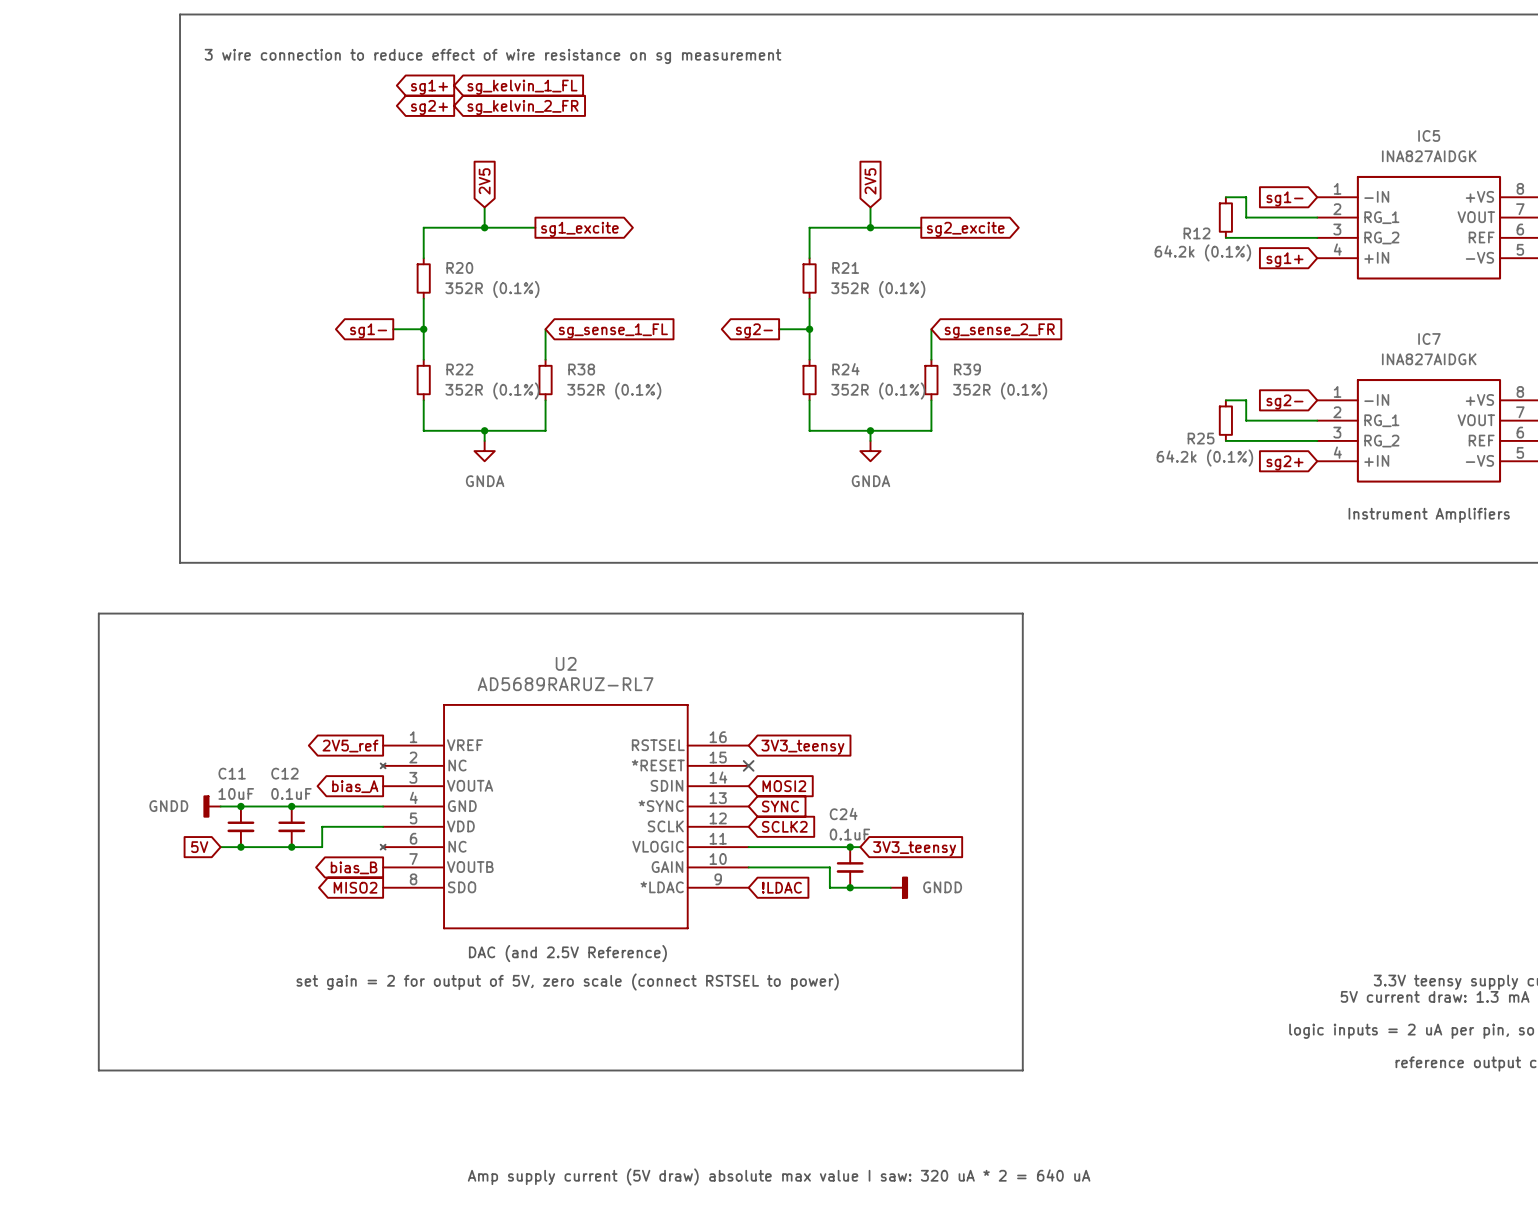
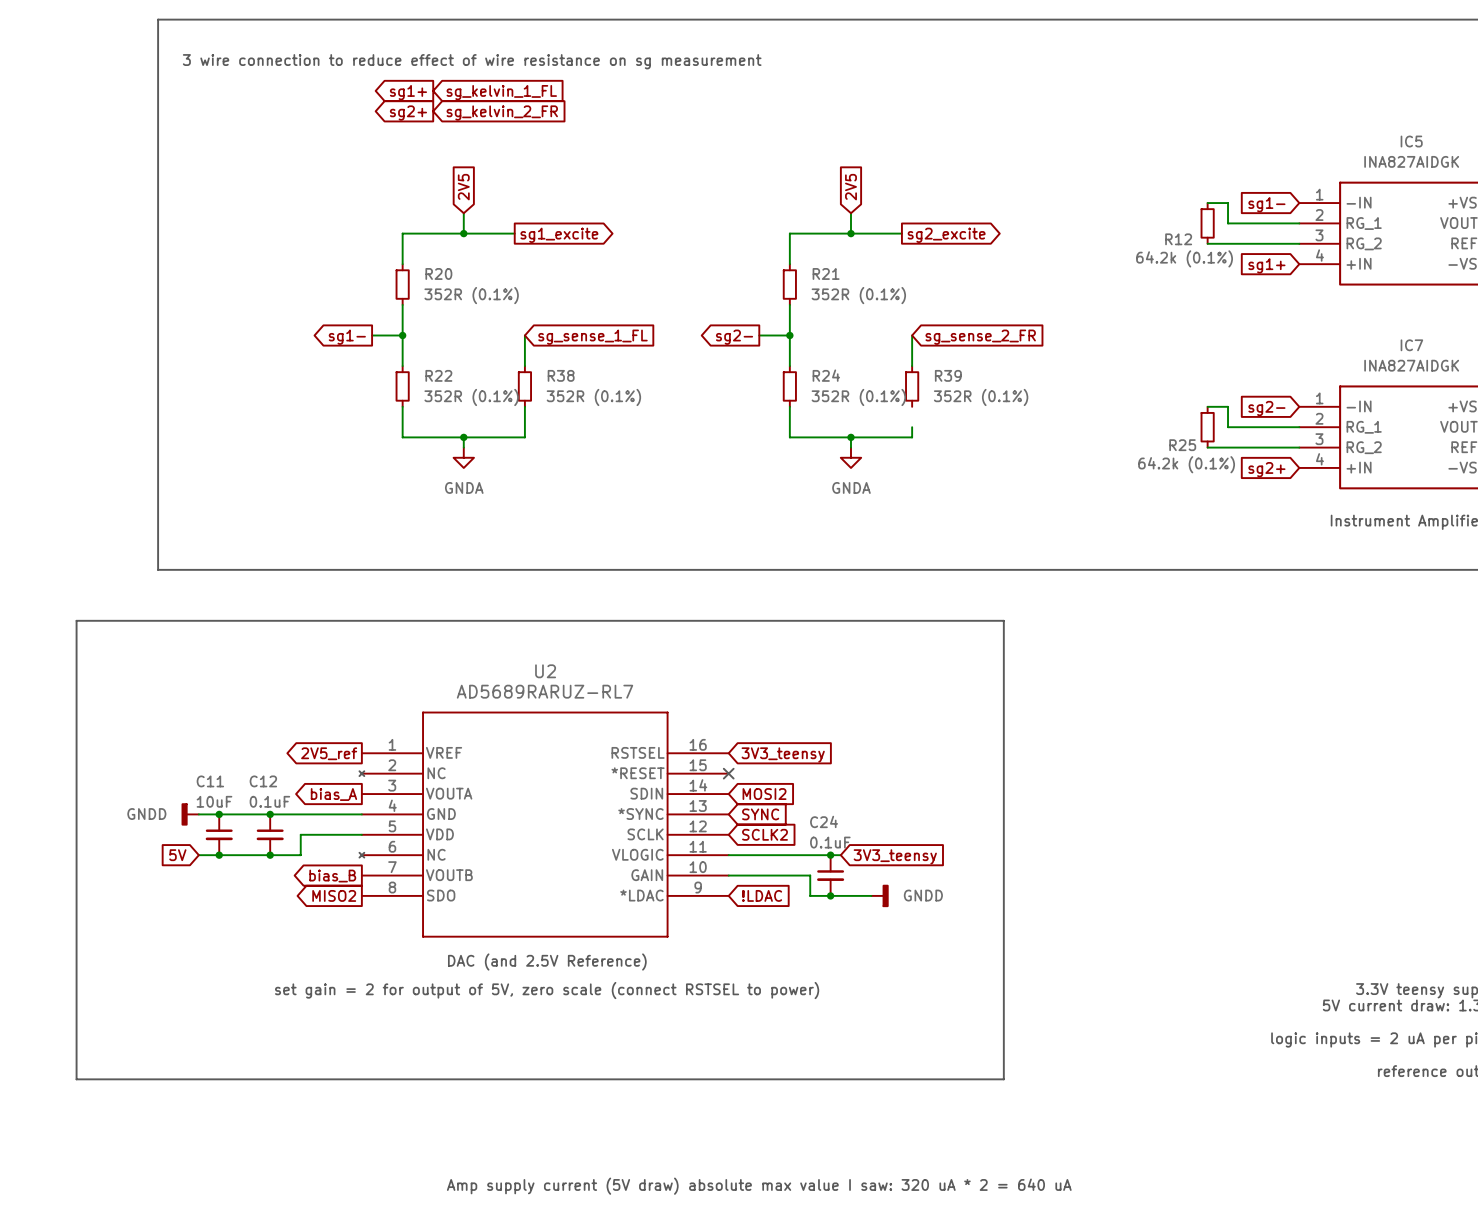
wire: (931, 400) (931, 420) -> none

